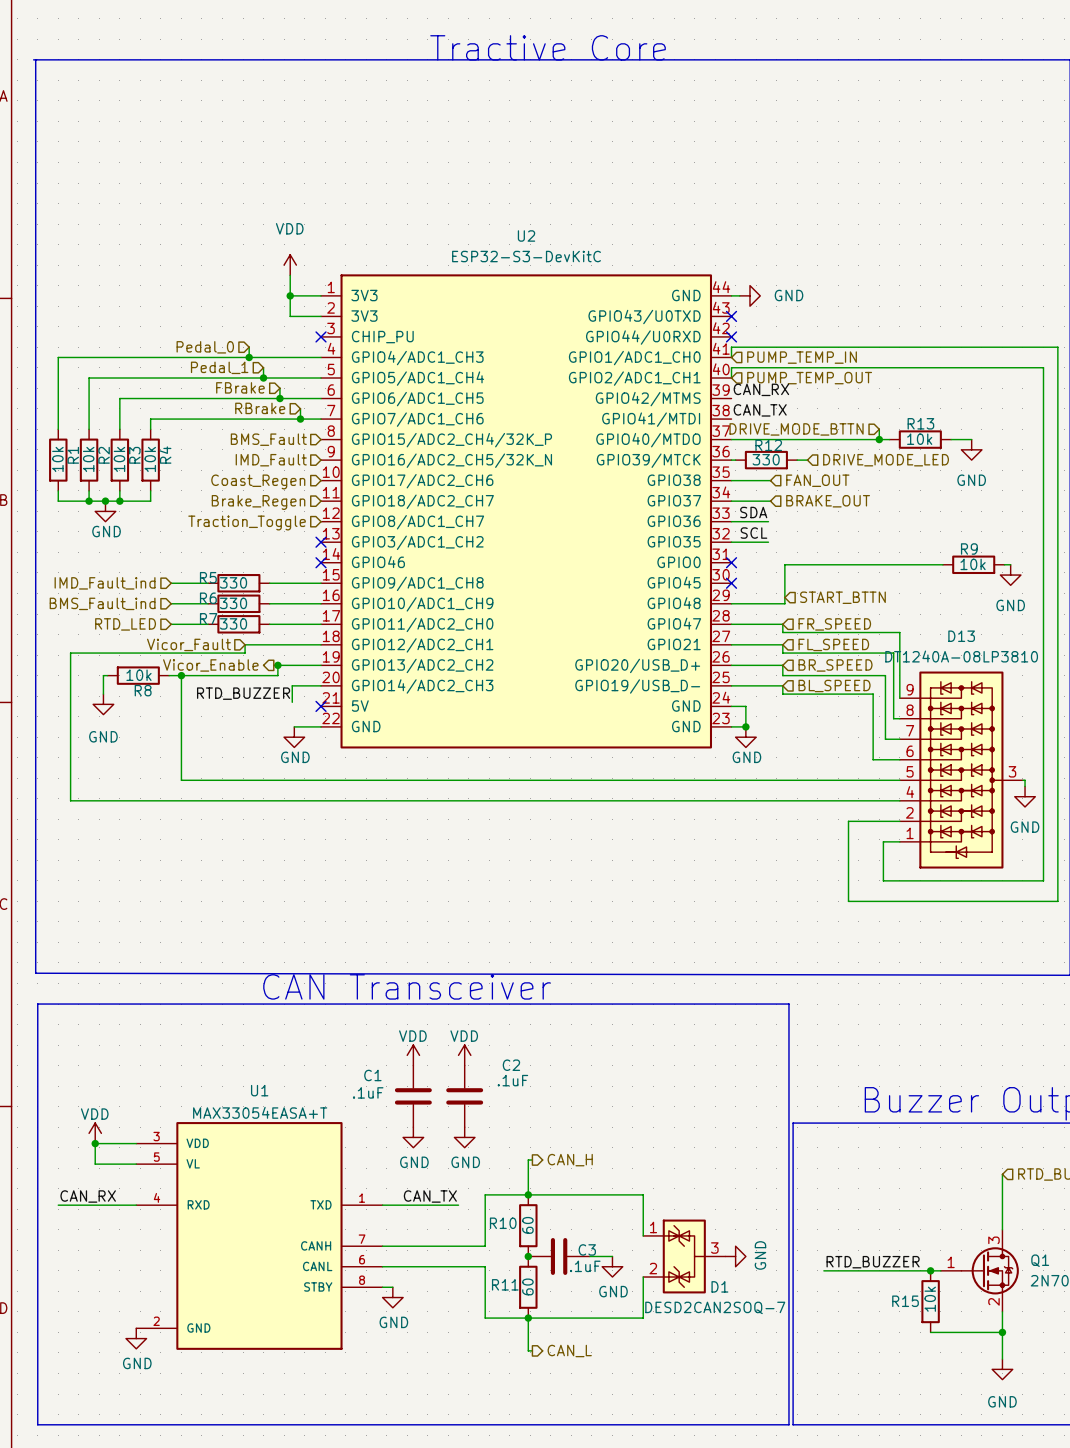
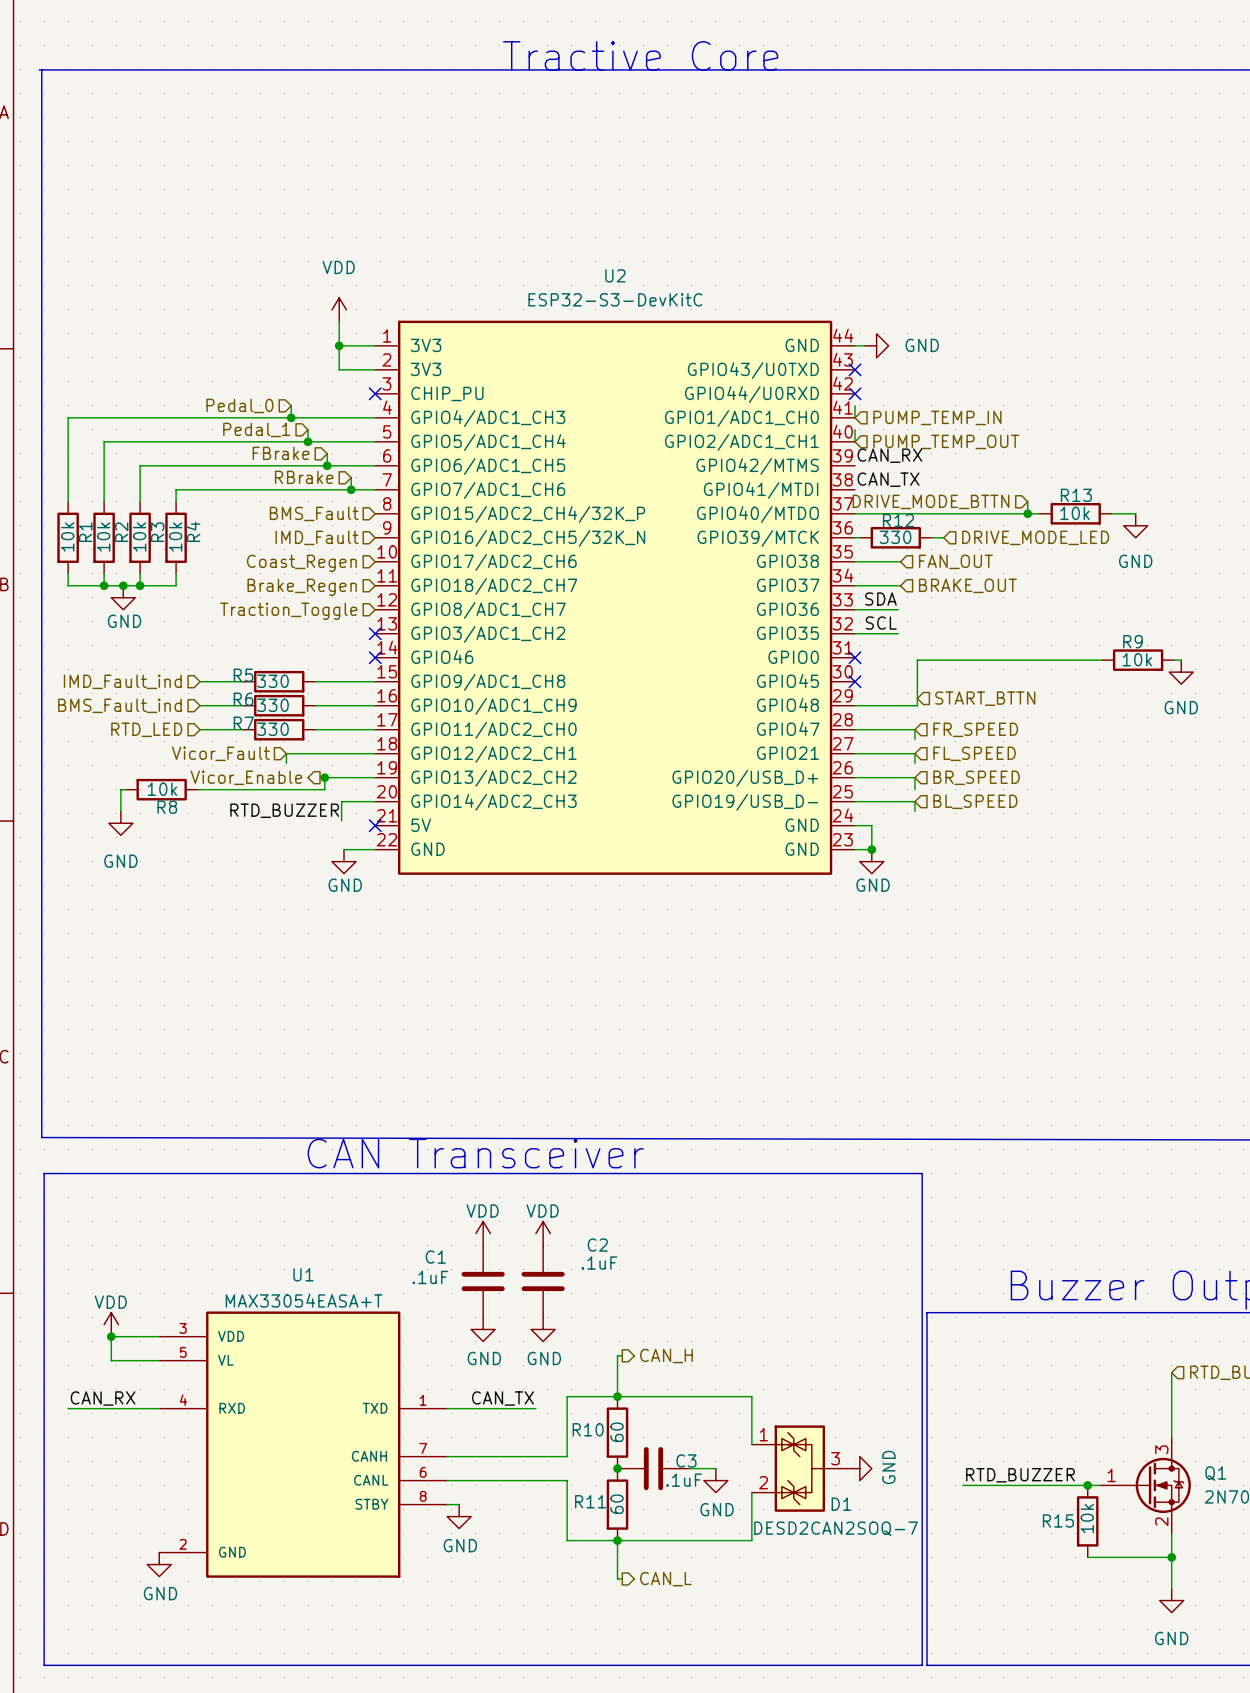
wire: (731, 347) (1057, 347) (1057, 901) (848, 901) (848, 821) (899, 821) -> none
wire: (731, 367) (1043, 367) (1043, 880) (883, 880) (883, 841) (899, 841) -> none
wire: (782, 632) (899, 632) (899, 698) -> none
wire: (245, 653) (70, 653) (70, 800) (899, 800) -> none
wire: (782, 653) (893, 653) (893, 718) (899, 718) -> none
wire: (181, 675) (181, 780) (899, 780) -> none
junction: (181, 675) -> none
wire: (782, 675) (885, 675) (885, 739) (899, 739) -> none
wire: (782, 694) (873, 694) (873, 759) (899, 759) -> none
D13: DT1240A-08LP3810 (961, 770) -> none
wire: (1022, 780) (1025, 780) (1025, 786) -> none
power symbol: GND (1025, 796) -> none

